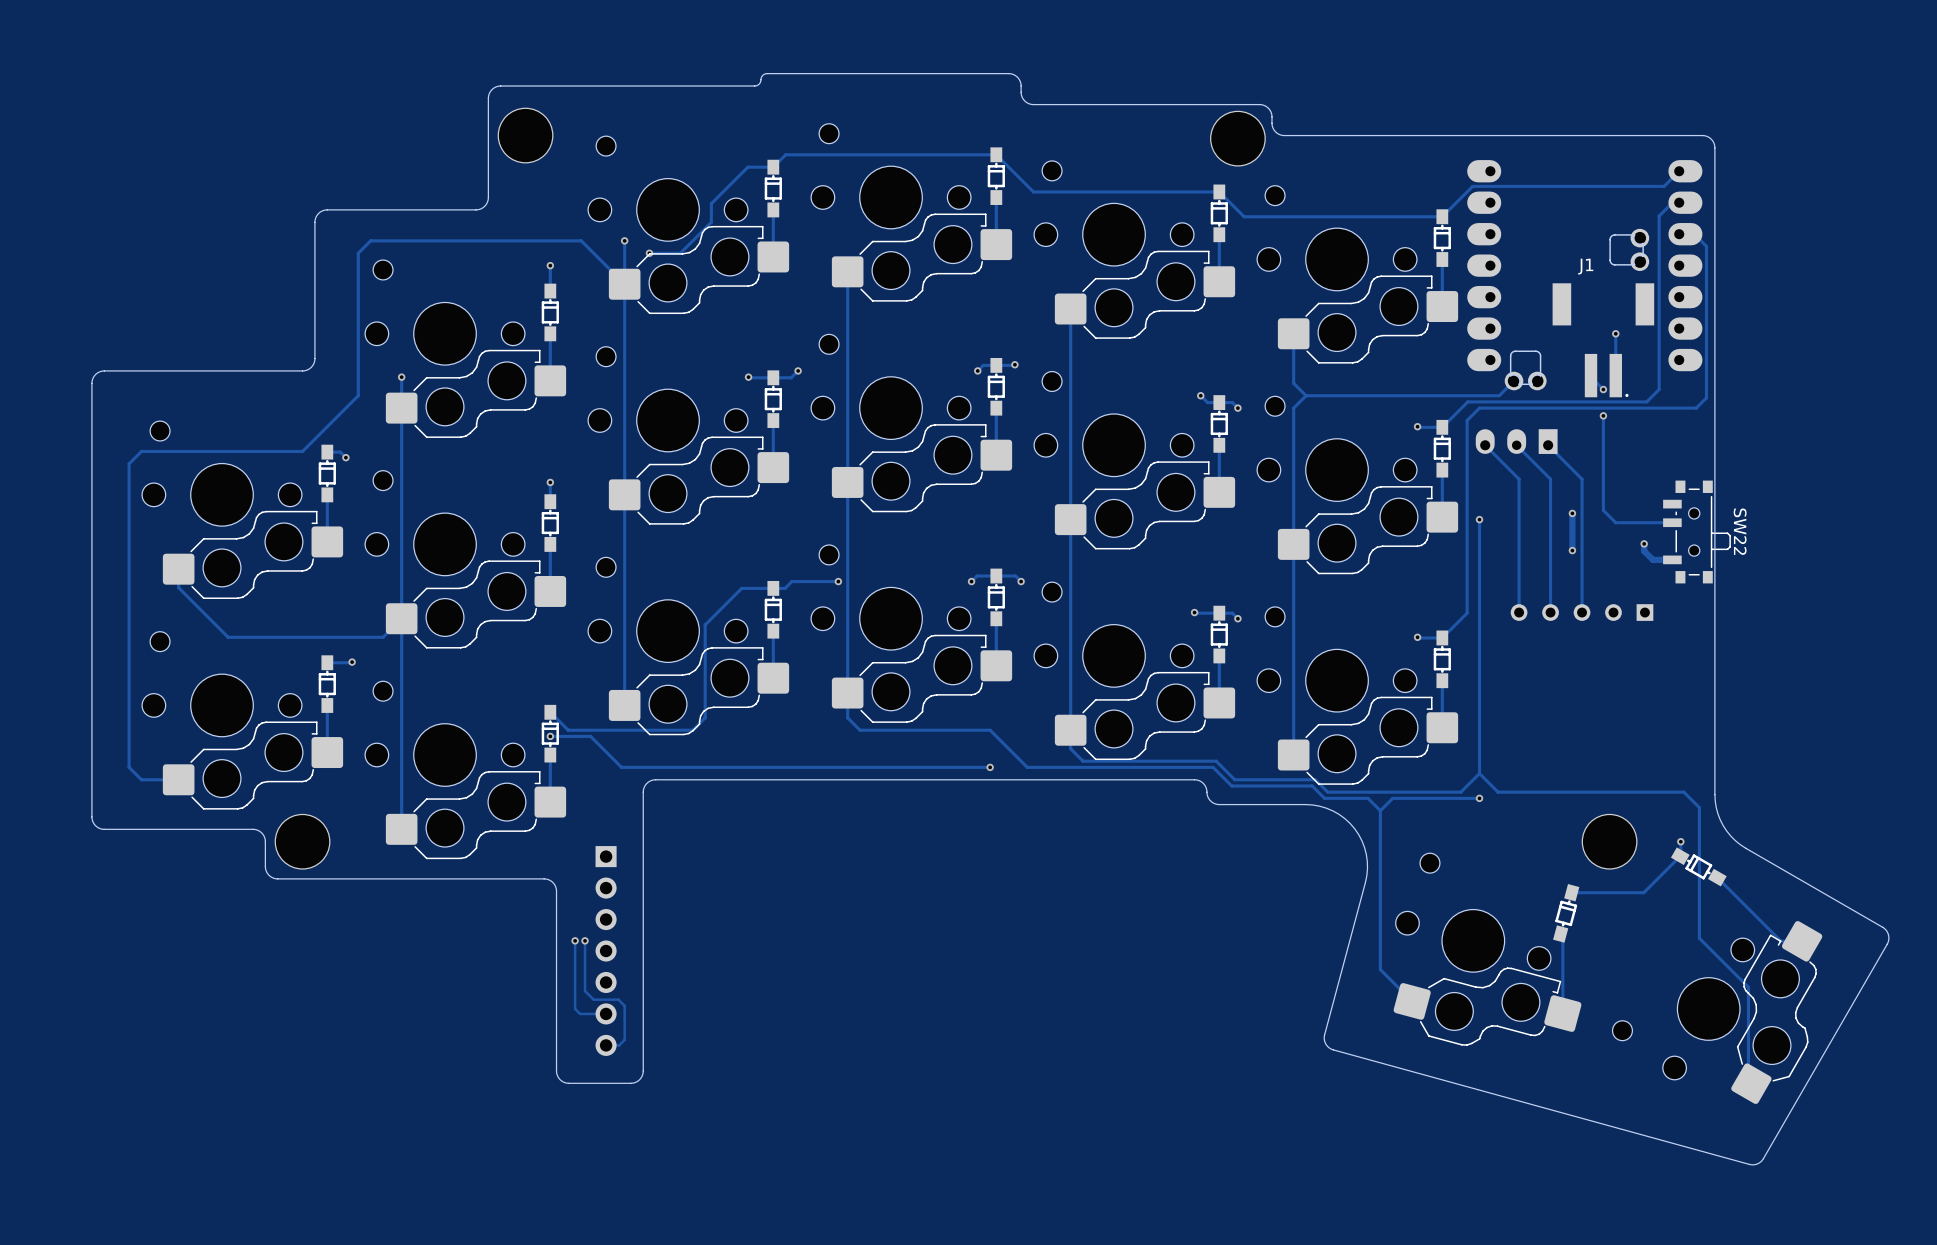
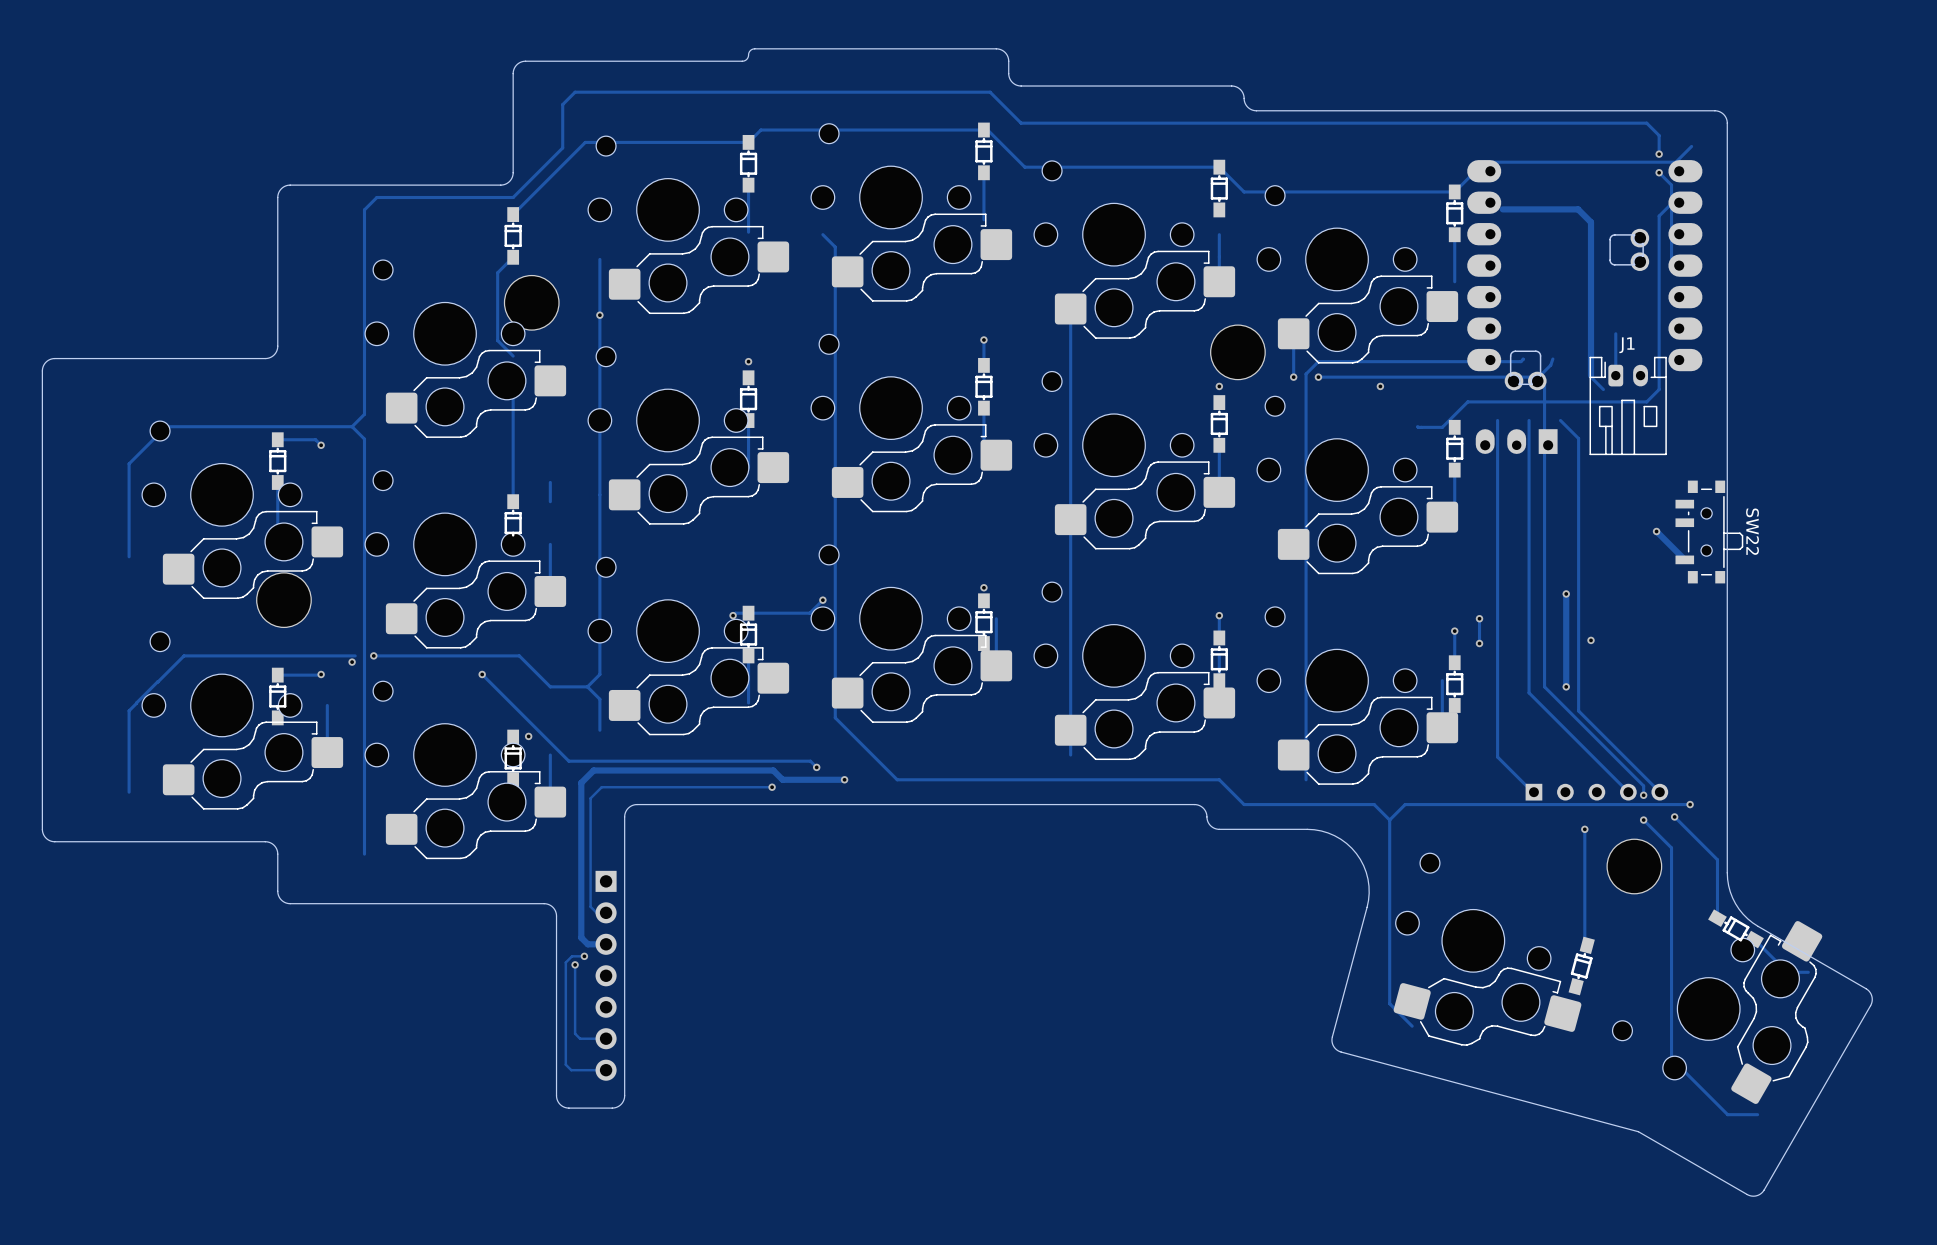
part position: (525, 135) -> (531, 302)
part position: (1237, 138) -> (1237, 352)
track: none -> (1691, 146) (1675, 162) (1484, 162) (1454, 191) (1244, 191) (1219, 167) (1024, 167) (987, 130) (760, 130) (748, 142) (585, 142) (513, 214)
track: none -> (1659, 154) (1659, 135) (1646, 123) (1021, 123) (990, 92) (575, 92) (562, 104) (562, 147) (513, 197) (376, 197) (364, 209) (364, 414) (352, 426)
via: none -> (1659, 154)
track: (1679, 171) (1664, 186) (1472, 186) (1442, 216) (1244, 216) (1219, 191) (1033, 191) (996, 154) (785, 154) (773, 167) (747, 167) (711, 203) (711, 222) (680, 253) (649, 253) -> none
track: none -> (1659, 172) (1671, 185) (1671, 259) (1684, 272) (1691, 272)
via: none -> (1659, 172)
part position: (996, 176) -> (983, 151)
part position: (773, 188) -> (748, 163)
track: (996, 197) (996, 244) -> (983, 172) (983, 219)
track: (773, 209) (773, 256) -> (748, 185) (748, 232)
track: none -> (1502, 209) (1578, 209) (1591, 222) (1591, 375)
part position: (1219, 213) -> (1219, 188)
track: (1679, 234) (1694, 234) (1706, 246) (1706, 397) (1696, 408) (1479, 408) (1467, 420) (1467, 613) (1442, 637) (1417, 637) -> none
part position: (1442, 238) -> (1454, 213)
track: (624, 240) (624, 705) -> none
via: (624, 240) -> none
via: (649, 253) -> none
track: none -> (513, 257) (497, 272) (497, 340) (513, 356)
track: none -> (599, 259) (599, 674) (587, 686)
track: (1442, 259) (1442, 306) -> (1454, 234) (1454, 281)
track: (550, 265) (550, 291) -> none
via: (550, 265) -> none
track: (847, 271) (847, 717) (860, 730) (990, 730) (1027, 767) (1213, 767) (1231, 785) (1312, 785) (1324, 798) (1368, 798) (1374, 804) -> (822, 234) (835, 247) (835, 717) (897, 779) (1219, 779) (1244, 804) (1374, 804)
J1 footprint: [1552, 283, 1655, 398] -> [1589, 356, 1667, 456]
track: (624, 284) (581, 240) (370, 240) (358, 253) (358, 395) (302, 451) (141, 451) -> (352, 426) (166, 426) (141, 451)
part position: (550, 312) -> (513, 235)
via: none -> (599, 315)
track: (550, 333) (550, 380) -> none
via: (1615, 333) -> none
track: none -> (983, 339) (983, 365)
via: none -> (983, 339)
track: none -> (1523, 359) (1520, 361) (1318, 361) (1306, 374) (1306, 779)
track: none -> (1552, 359) (1550, 365) (1538, 377)
track: (1014, 364) (983, 365) (977, 370) -> none
via: (1014, 364) -> none
track: (798, 370) (791, 377) (748, 377) -> none
via: (798, 370) -> none
via: (977, 370) -> none
track: (401, 377) (401, 829) -> none
via: (401, 377) -> none
via position: (748, 377) -> (748, 361)
track: (1293, 377) (1293, 383) (1306, 395) -> none
via: none -> (1293, 377)
via: none -> (1318, 377)
track: none -> (1538, 377) (1318, 377)
track: none -> (1538, 377) (1544, 382) (1544, 686) (1643, 785) (1643, 795)
track: none -> (513, 380) (513, 501)
track: (1510, 383) (1499, 395) (1306, 395) -> none
part position: (996, 386) -> (983, 386)
via: none -> (1219, 386)
via: (1603, 389) -> none
track: (1200, 395) (1207, 402) (1232, 402) (1237, 408) -> none
via: (1200, 395) -> none
track: (1306, 395) (1293, 408) (1293, 755) -> none
part position: (773, 399) -> (748, 399)
track: (996, 408) (996, 455) -> (983, 408) (983, 455)
via: (1237, 408) -> none
track: (1603, 415) (1603, 510) (1615, 522) (1672, 522) -> none
via: (1603, 415) -> none
track: (773, 420) (773, 467) -> (748, 420) (748, 467)
track: none -> (1529, 420) (1529, 692) (1628, 792)
track: none -> (1560, 420) (1578, 438) (1578, 710) (1659, 792)
track: none -> (352, 426) (364, 439) (364, 854)
via position: (1417, 426) -> (1380, 386)
track: none -> (277, 439) (315, 439) (321, 445)
track: (1485, 445) (1519, 479) (1519, 612) -> none
track: (1516, 445) (1550, 479) (1550, 612) -> none
track: (1548, 445) (1582, 479) (1582, 612) -> none
part position: (1442, 448) -> (1454, 448)
track: (327, 452) (340, 452) (345, 457) -> none
via position: (345, 457) -> (321, 445)
track: (1442, 470) (1442, 517) -> (1454, 470) (1454, 517)
part position: (327, 473) -> (277, 461)
via: (550, 482) -> none
track: (327, 494) (327, 541) -> (277, 482) (277, 529)
track: (1572, 513) (1572, 550) -> none
via: (1572, 513) -> none
track: (1479, 519) (1479, 618) -> none
via: (1479, 519) -> none
part position: (550, 523) -> (513, 523)
track: none -> (1656, 531) (1684, 559)
SW22 position: (1696, 532) -> (1709, 532)
track: (1644, 543) (1644, 551) (1652, 559) (1672, 559) -> none
via position: (1644, 543) -> (1656, 531)
via: (1572, 550) -> none
track: (129, 556) (129, 710) -> (355, 655) (184, 655) (129, 710)
track: (178, 569) (178, 587) (228, 637) (383, 637) (401, 618) -> none
track: (838, 581) (791, 581) (785, 588) (741, 588) (705, 624) (705, 717) (692, 730) (568, 730) (550, 712) -> none
via position: (838, 581) -> (822, 600)
via position: (971, 581) -> (983, 587)
track: (1021, 581) (1015, 576) (977, 576) (971, 581) -> none
via: (1021, 581) -> none
track: none -> (1566, 593) (1566, 686)
via: none -> (1566, 593)
part position: (996, 597) -> (983, 622)
track: none -> (822, 600) (809, 613) (735, 613) (733, 615)
part position: (773, 609) -> (748, 634)
track: (1194, 612) (1232, 613) (1237, 618) -> none
via: (1194, 612) -> none
part rotation: 0° (1582, 612) -> 180° (1596, 792)
part position: (1582, 612) -> (1596, 792)
via: none -> (733, 615)
track: none -> (1219, 615) (1219, 637)
via: none -> (1219, 615)
via: (1237, 618) -> none
via: none -> (1479, 618)
track: (773, 631) (773, 678) -> (748, 655) (748, 702)
track: none -> (1454, 631) (1454, 662)
via: none -> (1454, 631)
part position: (1219, 634) -> (1219, 659)
via: (1417, 637) -> none
via: none -> (1591, 640)
track: (1479, 643) (1479, 773) -> none
via: none -> (1479, 643)
track: none -> (373, 655) (519, 655) (550, 686) (587, 686)
via: none -> (373, 655)
part position: (1442, 659) -> (1454, 684)
track: (352, 662) (327, 662) -> none
track: none -> (321, 674) (277, 675)
via: none -> (321, 674)
track: none -> (482, 674) (568, 761) (810, 761) (816, 767)
via: none -> (482, 674)
part position: (327, 684) -> (277, 696)
track: none -> (587, 686) (599, 699) (599, 730)
via: none -> (1566, 686)
part position: (550, 733) -> (513, 758)
track: (550, 736) (590, 736) (621, 767) (990, 767) -> none
via position: (550, 736) -> (528, 736)
track: (1070, 748) (1083, 761) (1216, 761) (1234, 779) (1315, 779) (1327, 792) (1460, 792) (1479, 773) -> (1070, 748) (1070, 755)
track: (129, 767) (141, 779) (178, 779) -> (129, 767) (129, 792)
via: none -> (816, 767)
via: (990, 767) -> none
track: (1479, 773) (1498, 792) (1532, 792) -> (1497, 420) (1497, 757) (1532, 792)
track: none -> (844, 779) (782, 779) (773, 770) (593, 770) (581, 782) (581, 937) (587, 944) (606, 944)
via: none -> (844, 779)
track: none -> (772, 787) (601, 787) (590, 798) (590, 906) (596, 912) (606, 912)
via: none -> (772, 787)
track: (1533, 792) (1683, 792) (1699, 807) (1699, 938) (1748, 987) (1748, 1080) (1751, 1083) -> none
via: none -> (1643, 795)
track: (1479, 798) (1392, 798) (1380, 810) (1380, 969) (1412, 1001) -> none
via: (1479, 798) -> none
track: none -> (1690, 804) (1405, 804) (1389, 820)
via: none -> (1690, 804)
track: none -> (1380, 810) (1389, 820)
track: none -> (1674, 816) (1717, 859) (1717, 918)
via: none -> (1674, 816)
track: none -> (1389, 820) (1389, 1003) (1412, 1026)
track: none -> (1643, 820) (1671, 847) (1671, 1058) (1727, 1114) (1757, 1114)
via: none -> (1643, 820)
track: none -> (1584, 829) (1584, 942) (1587, 945)
via: none -> (1584, 829)
part position: (302, 841) -> (283, 600)
part position: (1609, 841) -> (1634, 866)
track: (1680, 841) (1680, 855) (1643, 892) (1571, 892) -> none
via: (1680, 841) -> none
part position: (1698, 866) -> (1735, 928)
track: (1717, 877) (1781, 941) (1802, 941) -> none
part position: (1566, 913) -> (1581, 966)
board edge: (556, 916) (556, 888) (552, 882) (546, 879) (276, 878) (270, 876) (266, 870) (265, 838) (262, 834) (257, 830) (102, 829) (95, 825) (92, 818) (93, 377) (97, 372) (104, 370) (302, 370) (310, 368) (314, 358) (314, 222) (316, 215) (321, 211) (327, 209) (475, 209) (483, 207) (488, 197) (488, 97) (494, 87) (500, 86) (754, 86) (759, 83) (762, 75) (767, 73) (1008, 73) (1018, 78) (1022, 97) (1026, 102) (1032, 104) (1262, 104) (1270, 111) (1273, 129) (1282, 135) (1702, 135) (1709, 137) (1713, 141) (1714, 147) (1716, 807) (1726, 831) (1740, 844) (1882, 927) (1886, 931) (1888, 937) (1887, 944) (1760, 1161) (1749, 1164) (1329, 1047) (1324, 1041) (1324, 1034) (1366, 875) (1366, 854) (1362, 840) (1350, 823) (1339, 814) (1326, 808) (1305, 804) (1216, 804) (1208, 798) (1204, 784) (1195, 779) (650, 781) (645, 785) (643, 792) (642, 1075) (638, 1080) (632, 1083) (568, 1083) (560, 1079) (556, 1070) -> (556, 916) (552, 907) (544, 903) (288, 903) (282, 900) (278, 895) (277, 851) (274, 845) (268, 842) (54, 841) (48, 839) (43, 833) (43, 366) (48, 360) (54, 358) (265, 358) (273, 355) (277, 346) (277, 196) (283, 187) (290, 185) (504, 184) (510, 180) (513, 174) (513, 72) (515, 67) (520, 62) (742, 61) (747, 58) (750, 50) (754, 48) (997, 48) (1006, 54) (1009, 77) (1013, 83) (1018, 85) (1233, 86) (1242, 91) (1246, 106) (1255, 110) (1714, 110) (1720, 112) (1725, 116) (1727, 123) (1728, 885) (1739, 909) (1752, 922) (1866, 988) (1870, 992) (1872, 998) (1870, 1005) (1760, 1193) (1755, 1196) (1747, 1194) (1638, 1131) (1336, 1049) (1332, 1044) (1332, 1036) (1368, 900) (1368, 879) (1360, 859) (1346, 843) (1334, 835) (1321, 830) (1215, 828) (1208, 823) (1204, 809) (1195, 804) (631, 805) (626, 810) (624, 816) (623, 1101) (618, 1106) (613, 1108) (563, 1106) (556, 1098) (556, 1070)
track: (1560, 934) (1562, 936) (1562, 1013) -> none
track: none -> (1754, 939) (1787, 972) (1808, 972)
track: (575, 940) (575, 964) -> none
via: (575, 940) -> none
track: (585, 940) (585, 991) (593, 999) (618, 999) (624, 1005) (624, 1039) (619, 1045) (606, 1045) -> none
via: (585, 940) -> none
part position: (606, 951) -> (606, 975)
track: none -> (584, 956) (572, 956) (565, 962) (565, 1064) (571, 1070) (606, 1070)
via: none -> (584, 956)
via: none -> (575, 964)
track: (575, 1008) (580, 1013) (606, 1013) -> (575, 1008) (575, 1033) (580, 1038) (606, 1038)

